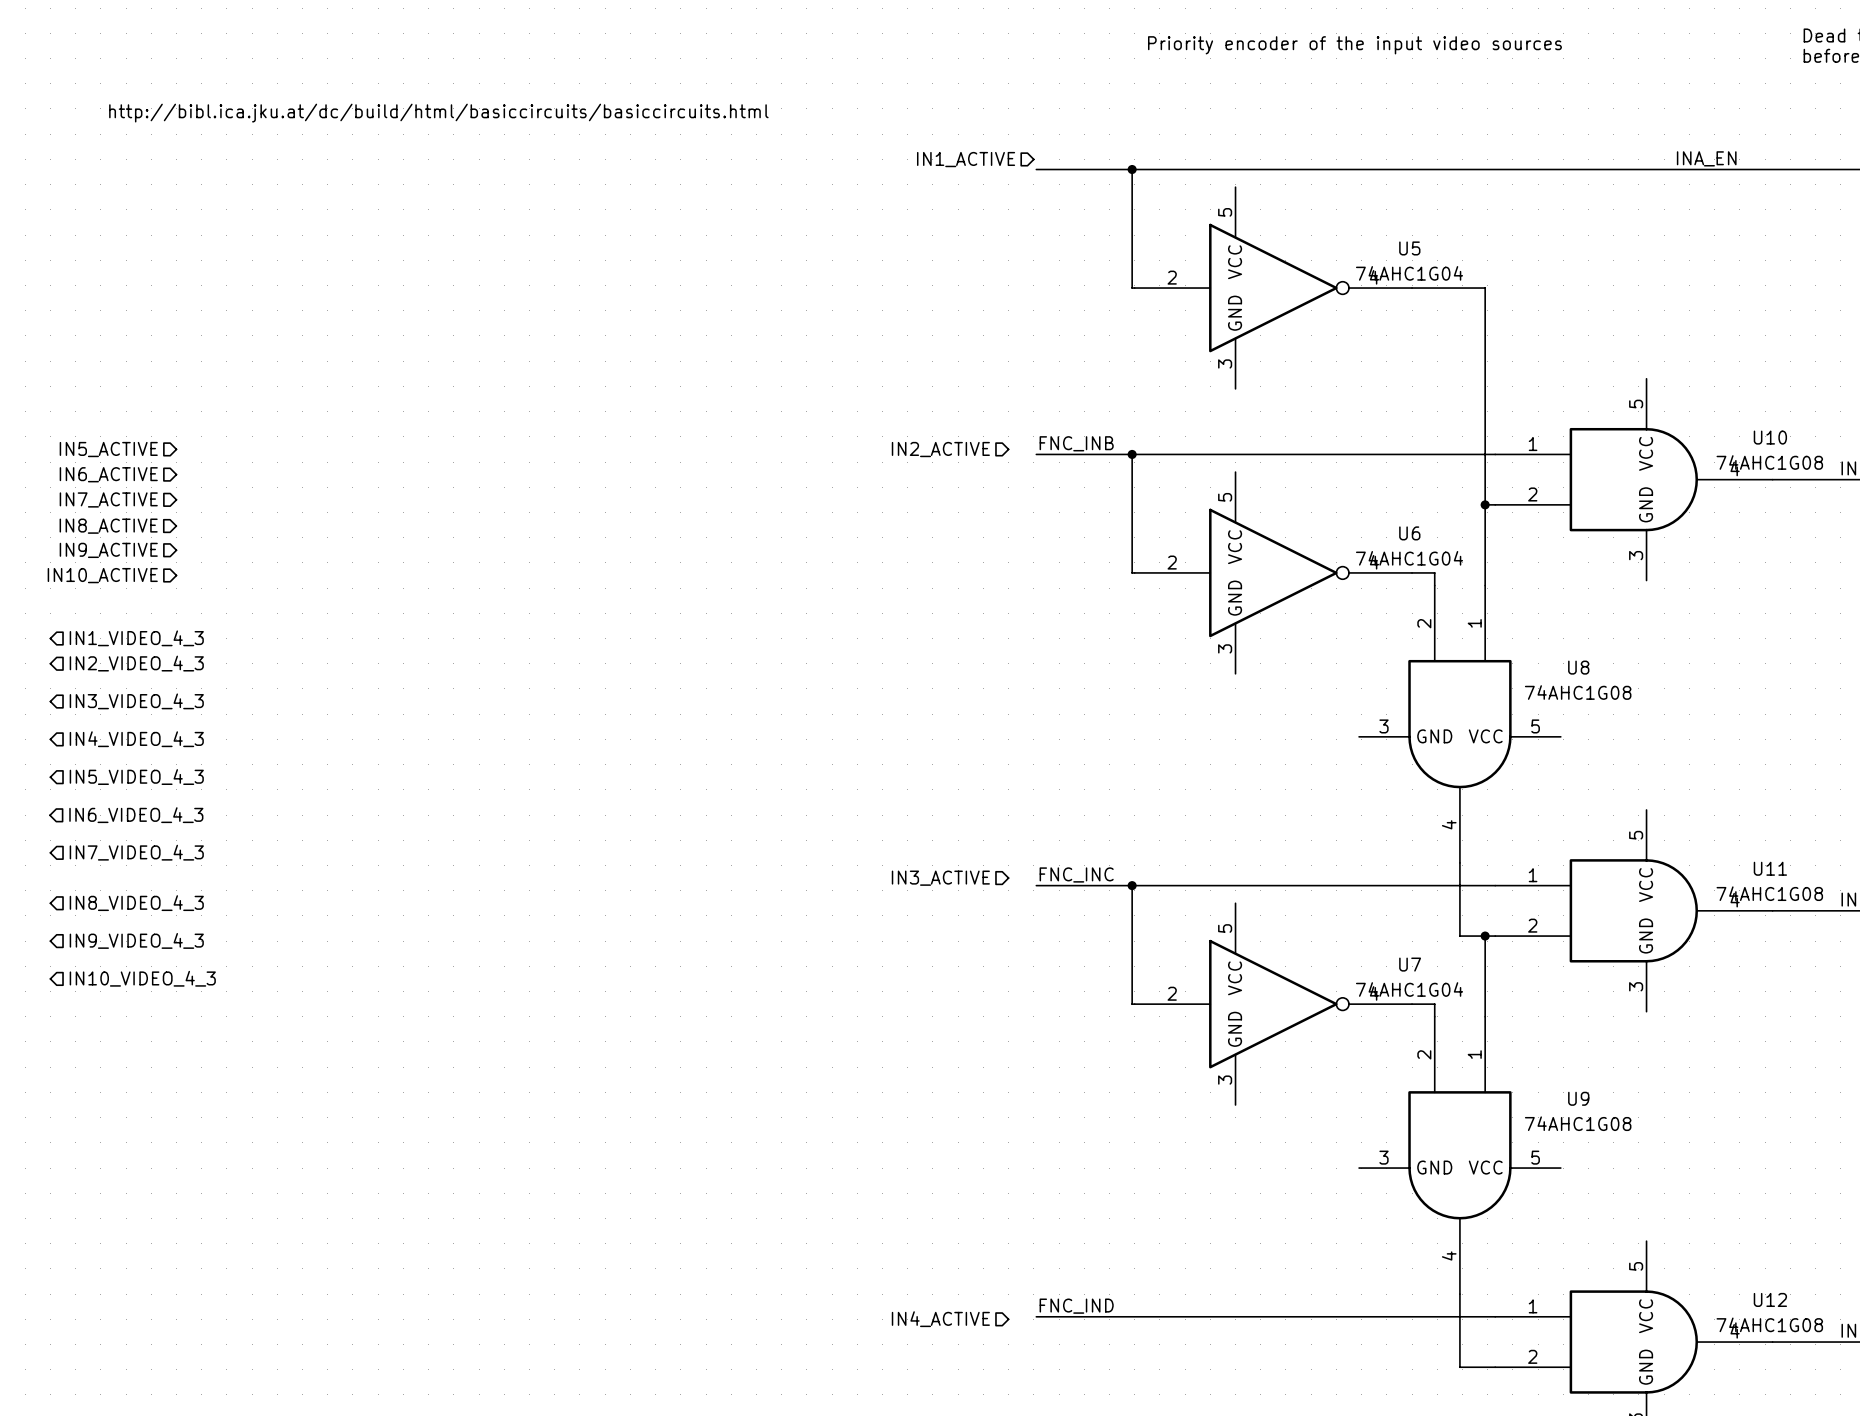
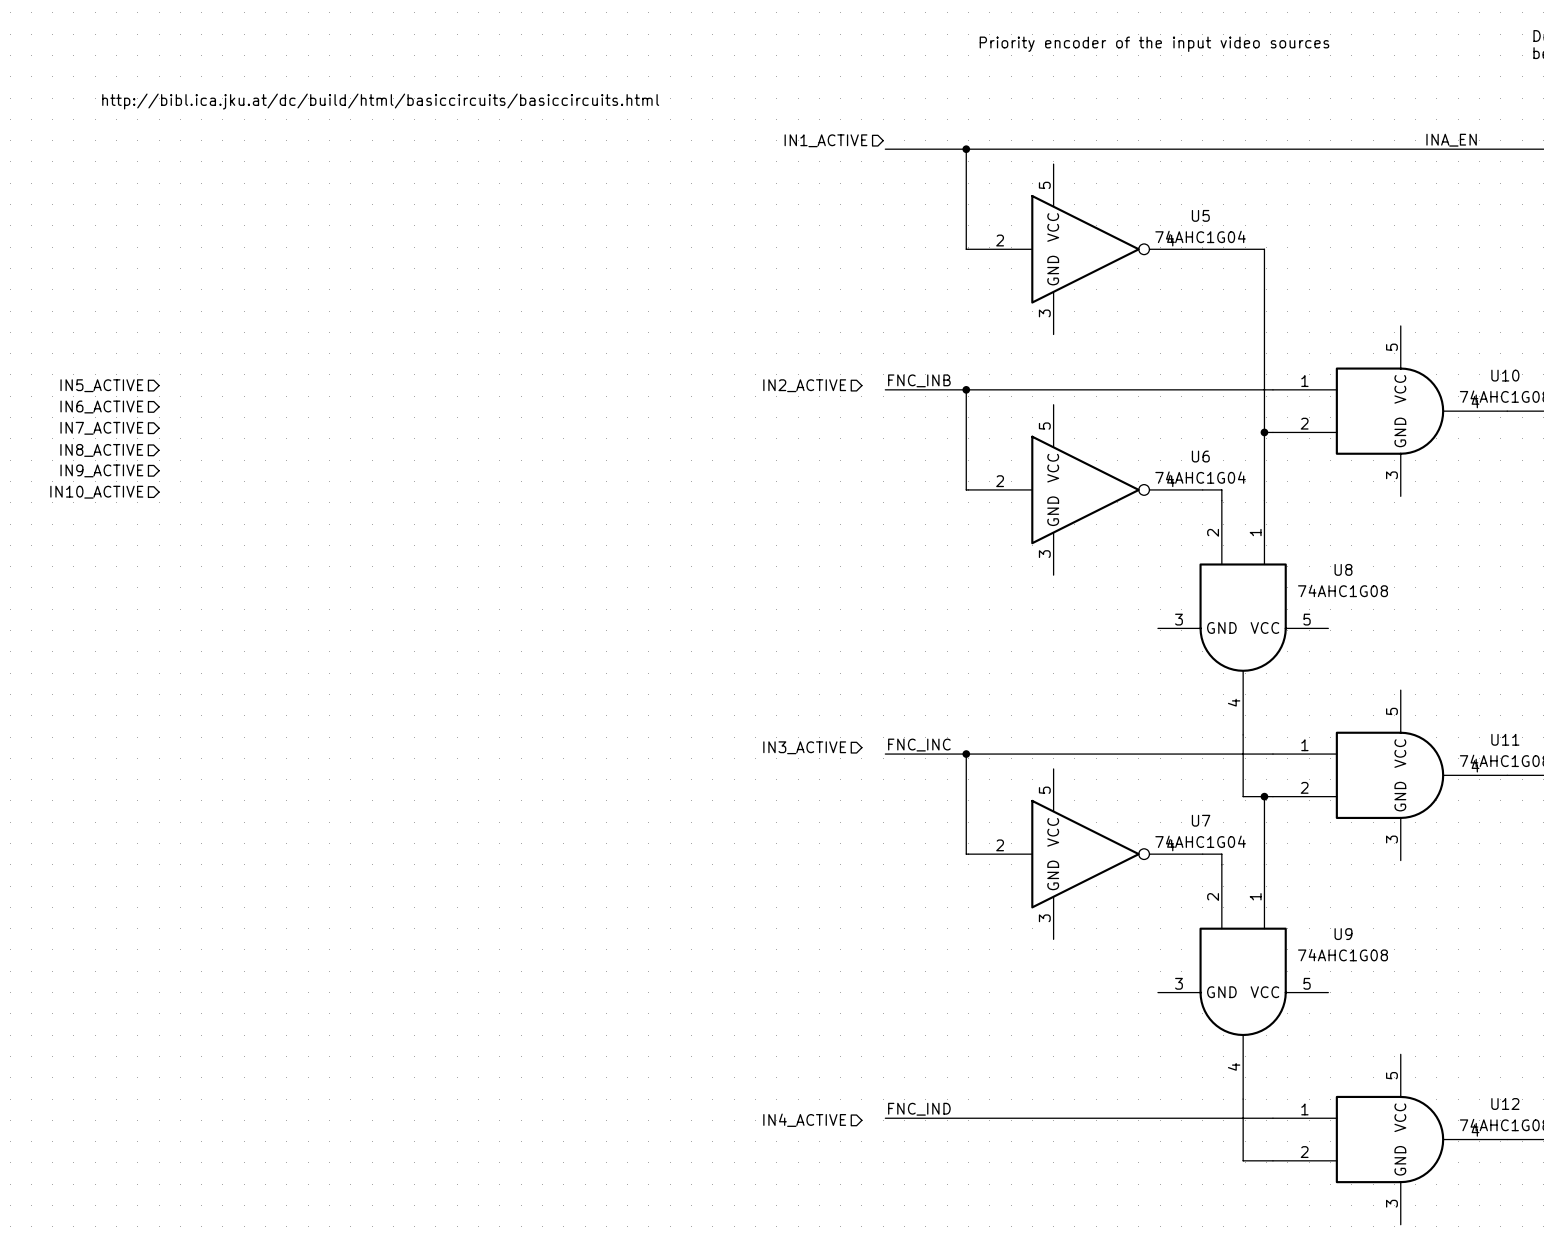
hierarchical label: IN1_VIDEO_4_3 (136, 638) -> none
hierarchical label: IN2_VIDEO_4_3 (136, 663) -> none
hierarchical label: IN3_VIDEO_4_3 (136, 701) -> none
hierarchical label: IN4_VIDEO_4_3 (136, 739) -> none
hierarchical label: IN5_VIDEO_4_3 (136, 777) -> none
hierarchical label: IN6_VIDEO_4_3 (136, 815) -> none
hierarchical label: IN7_VIDEO_4_3 (136, 852) -> none
hierarchical label: IN8_VIDEO_4_3 (136, 903) -> none
hierarchical label: IN9_VIDEO_4_3 (136, 940) -> none
hierarchical label: IN10_VIDEO_4_3 (142, 978) -> none

